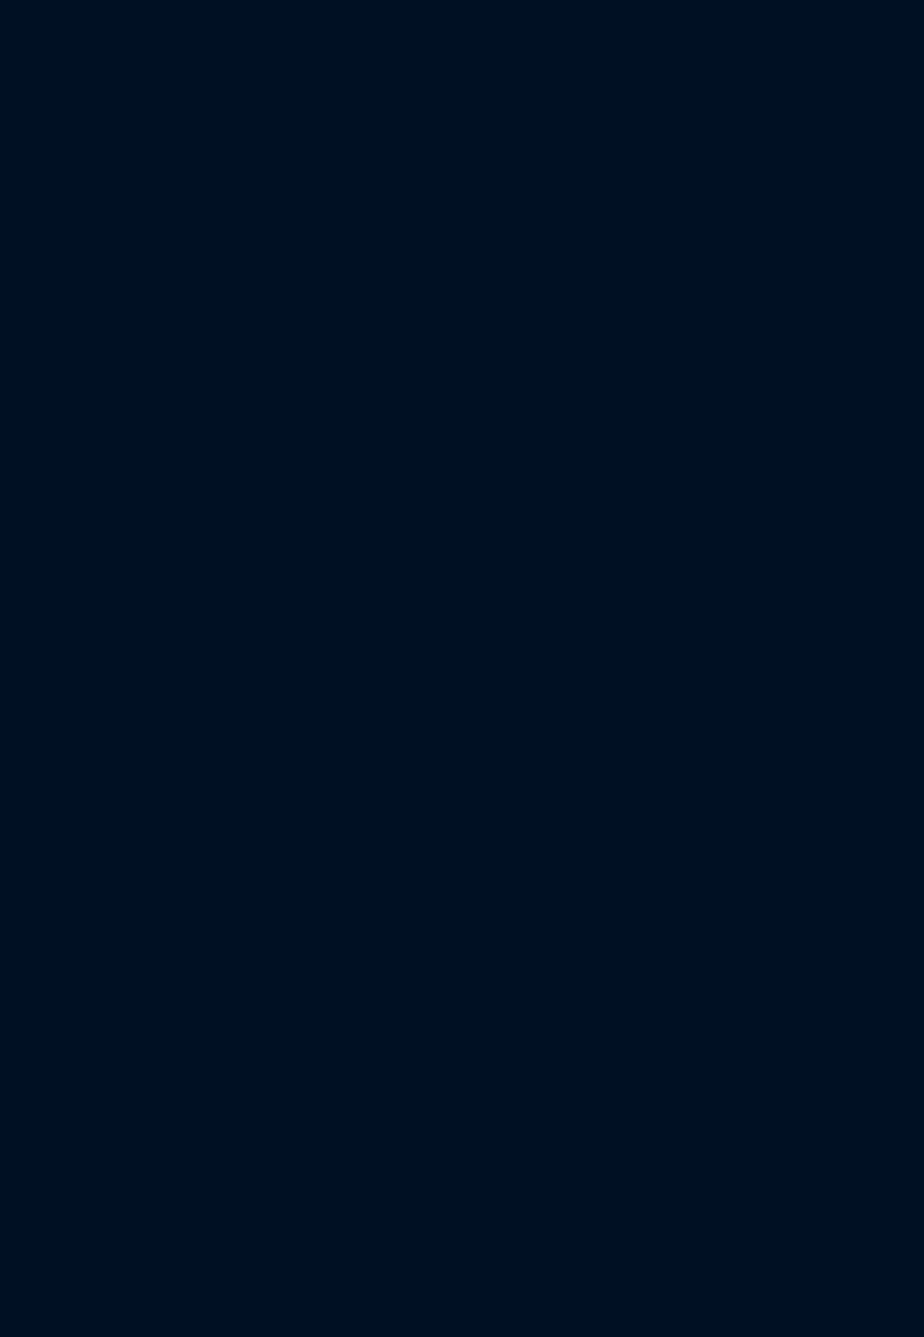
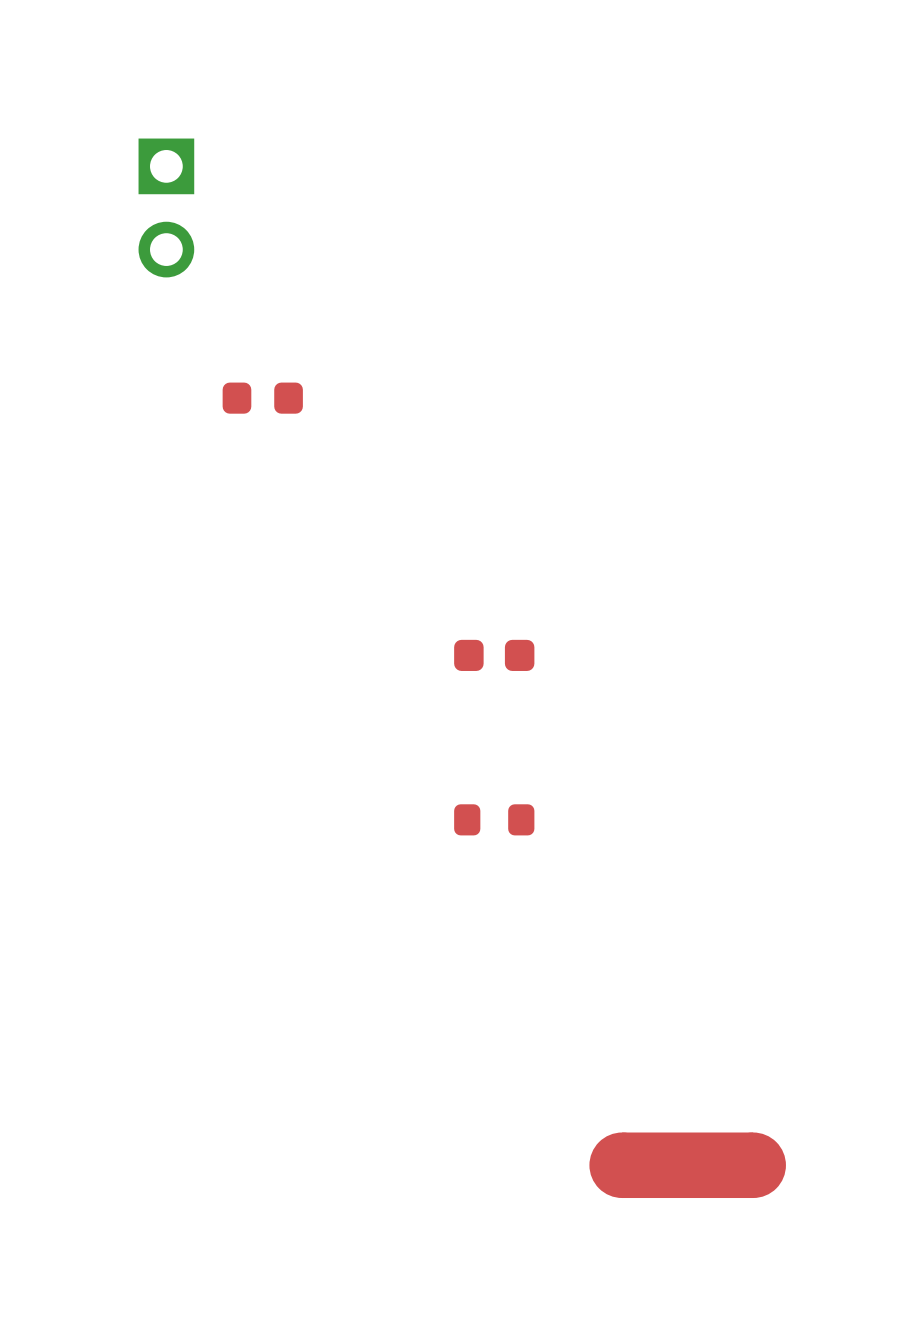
part: none -> (166, 207)
part: none -> (262, 398)
part: none -> (494, 655)
part: none -> (494, 819)
part: none -> (687, 1165)

